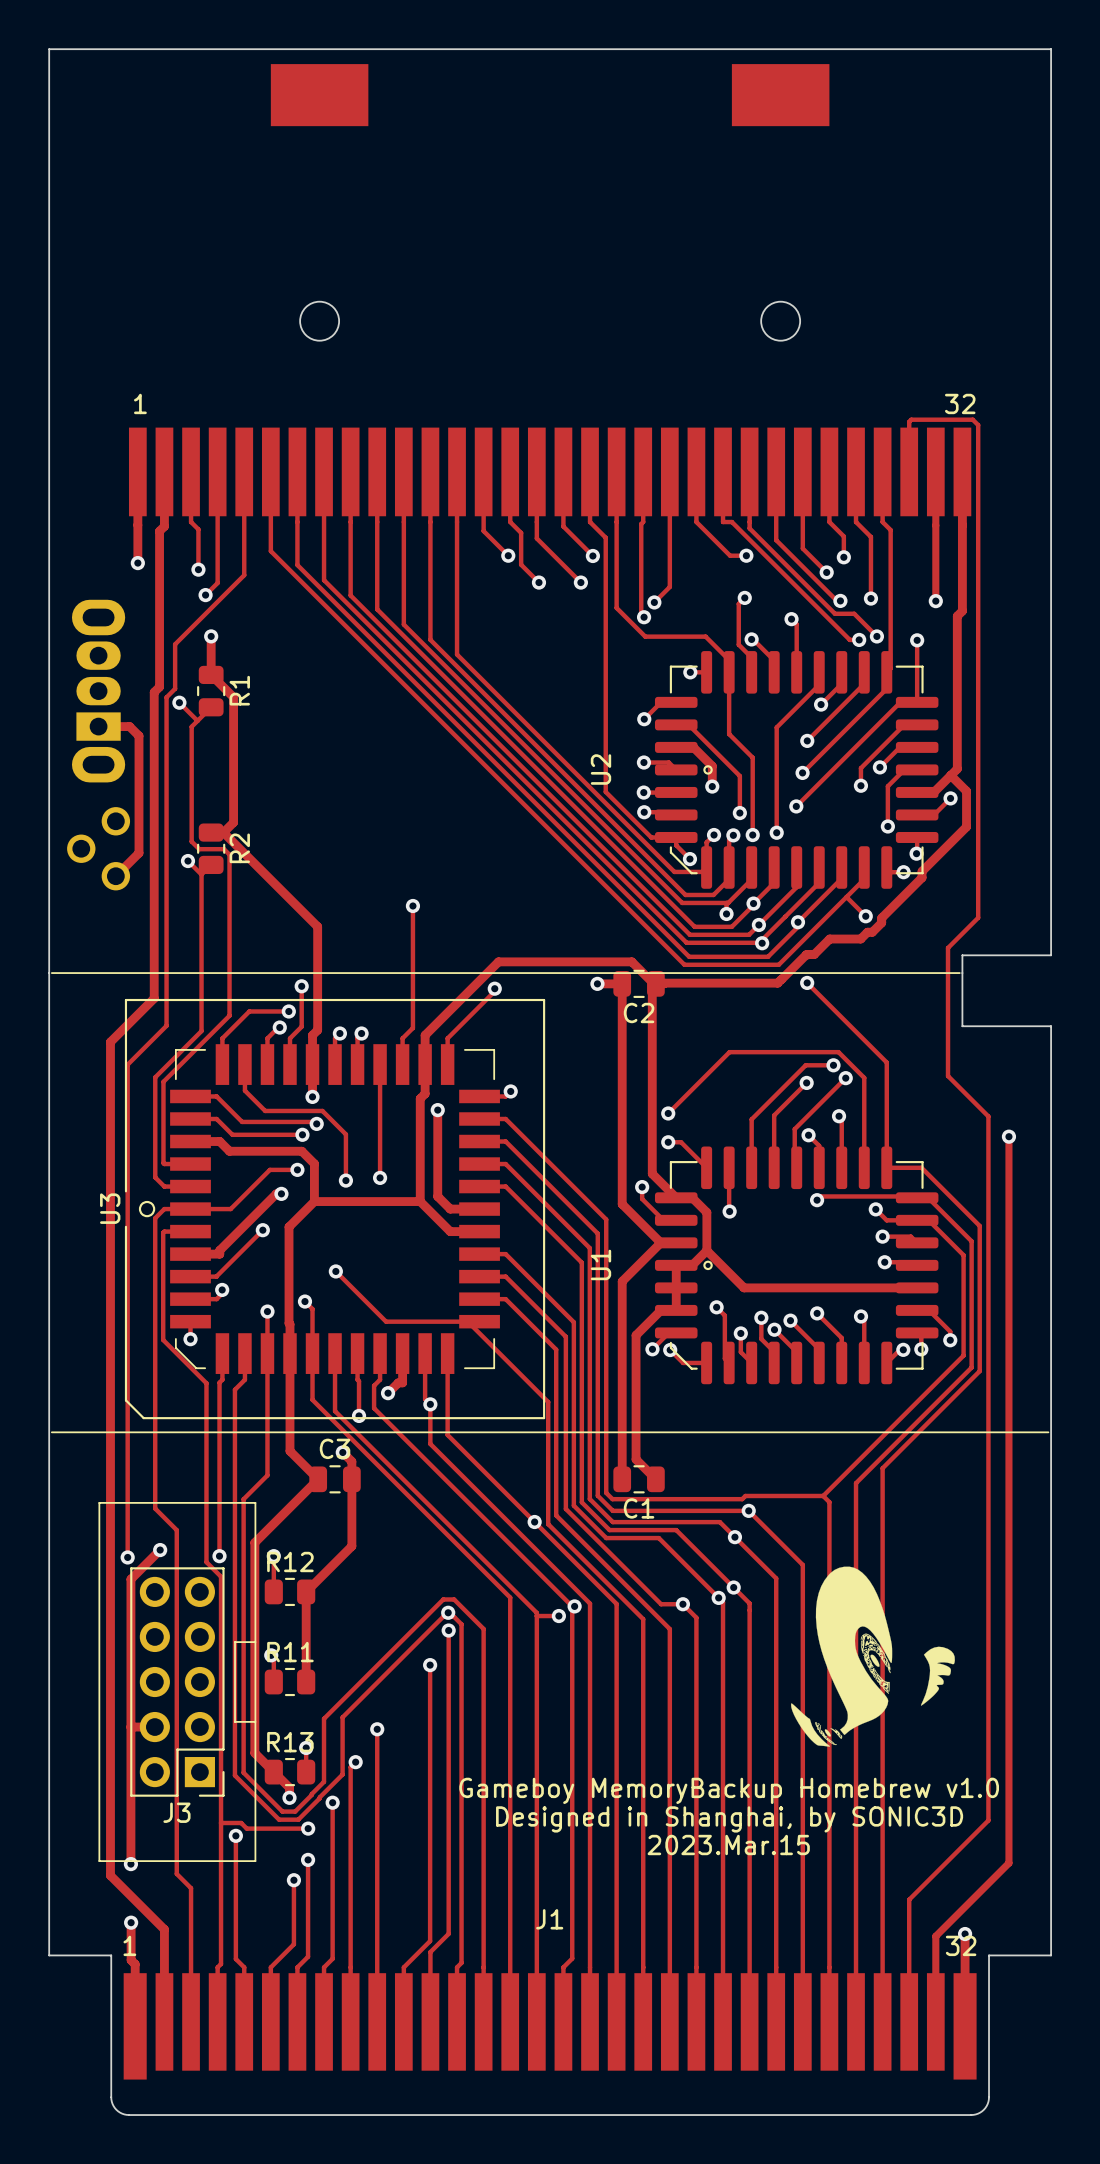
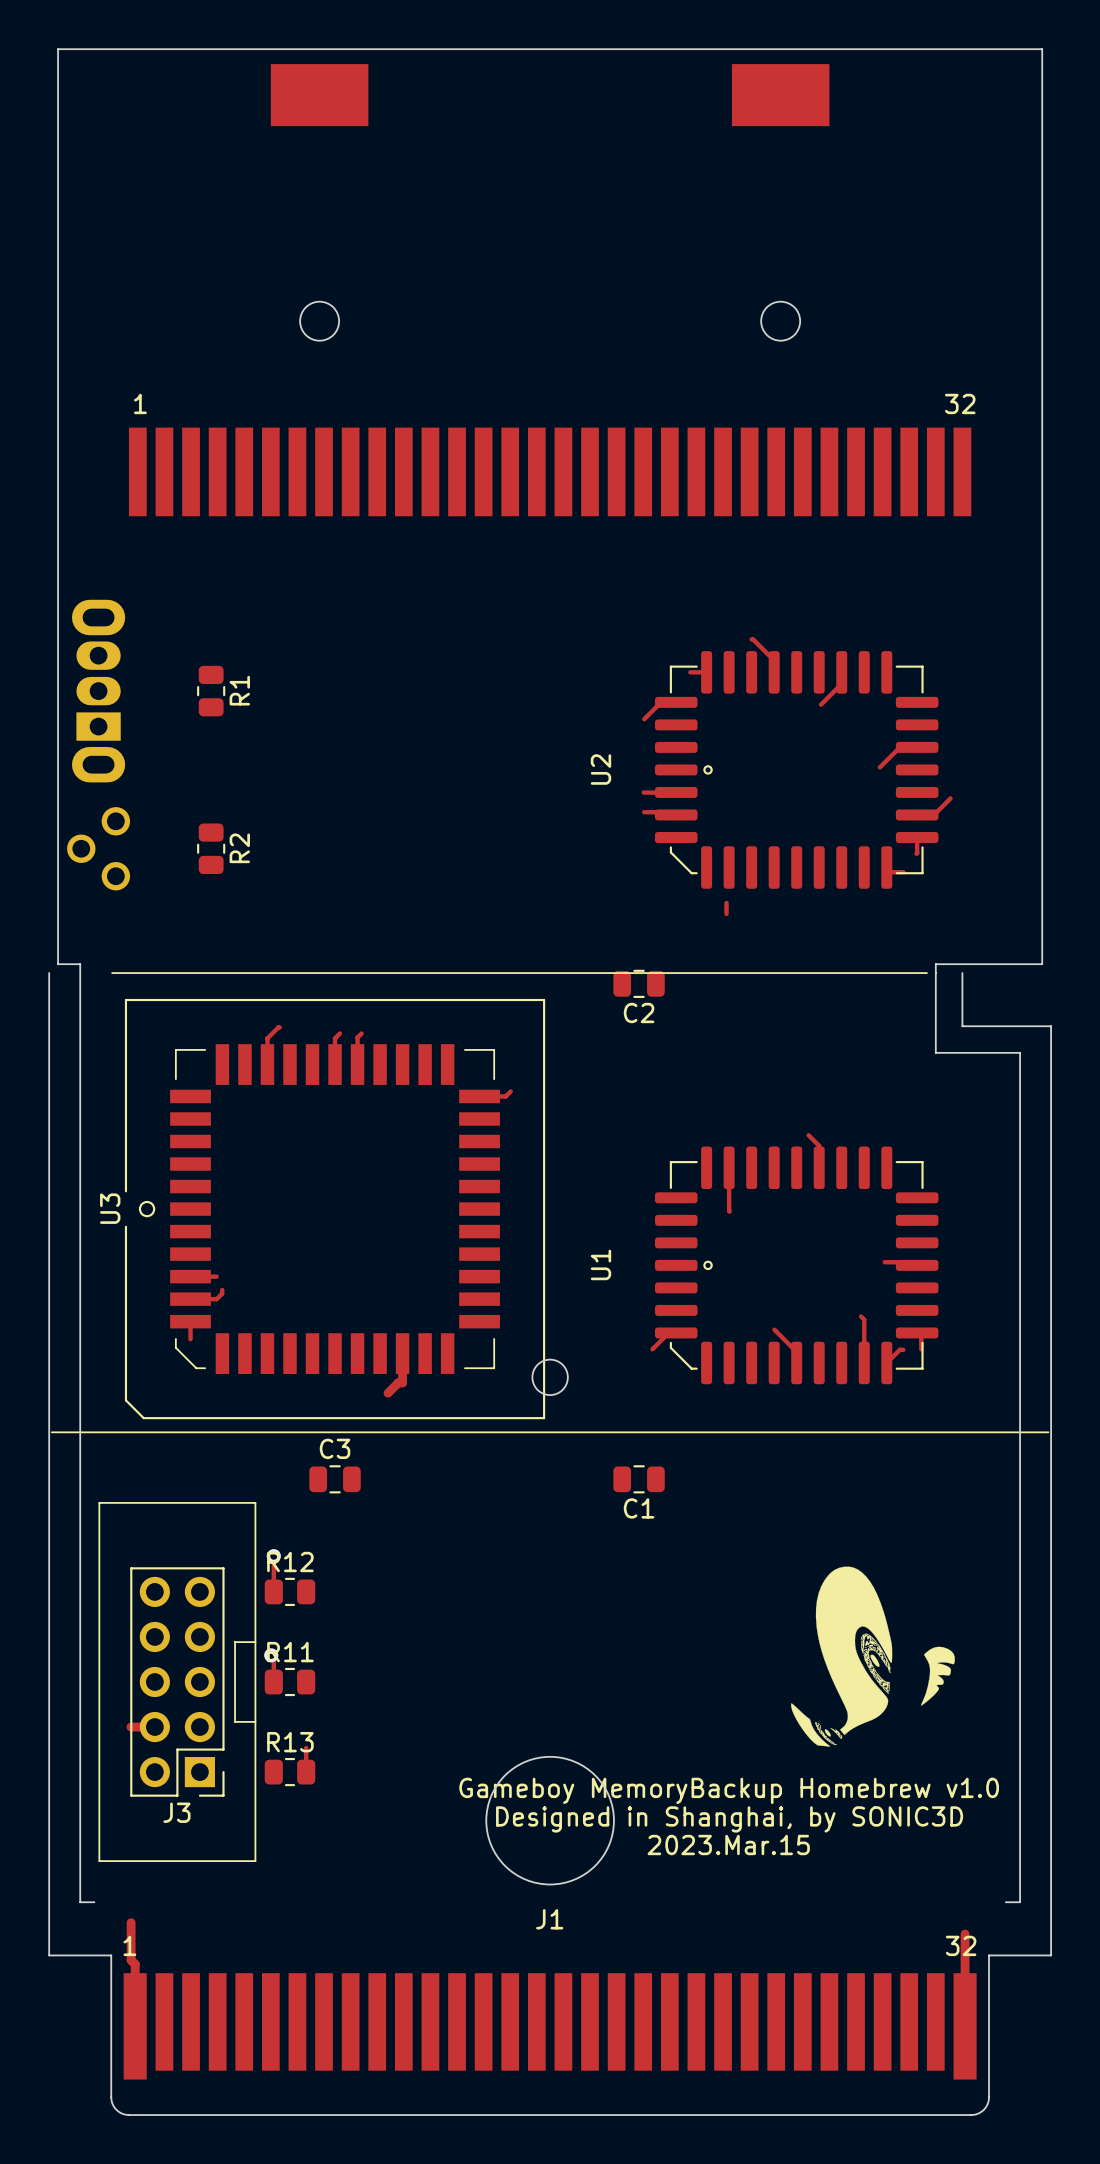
board edge: (58, 49) (49, 49) (49, 973) -> (58, 49) (58, 964) (80, 964) (80, 1902) (94, 1902)
board edge: (1042, 49) (1051, 49) (1051, 955) (962, 955) (962, 973) -> (1042, 49) (1042, 964) (935, 964) (935, 1052) (1020, 1052) (1020, 1902) (1005, 1902)
track: (137, 471) (137, 563) -> none
track: (164, 471) (164, 526) (159, 531) (159, 686) (154, 692) (154, 998) (110, 1042) (110, 1875) (164, 1929) (164, 2021) -> none
track: (191, 471) (191, 522) (198, 529) (198, 569) -> none
track: (217, 471) (217, 583) (205, 595) -> none
track: (244, 471) (244, 575) (175, 644) (175, 688) (166, 697) (166, 1025) (127, 1064) (127, 1557) -> none
track: (270, 471) (270, 551) (684, 964) (778, 964) (864, 879) (864, 867) -> none
track: (297, 471) (297, 565) (689, 956) (768, 956) (797, 926) (797, 922) (841, 878) (841, 867) -> none
track: (324, 471) (324, 580) (686, 942) (759, 942) (785, 916) -> none
track: (350, 471) (350, 595) (689, 934) (749, 934) (796, 887) (796, 867) -> none
track: (377, 471) (377, 609) (694, 926) (731, 926) (774, 882) (774, 867) -> none
track: (403, 471) (403, 624) (682, 902) (728, 902) (751, 879) (751, 867) -> none
track: (430, 471) (430, 639) (685, 894) (713, 894) (729, 879) (729, 839) (733, 835) -> none
track: (457, 471) (457, 654) (674, 871) (702, 871) (706, 867) (706, 842) (714, 835) -> none
track: (483, 471) (483, 531) (508, 555) -> none
track: (510, 471) (510, 522) (521, 532) (521, 564) (538, 582) -> none
track: (536, 471) (536, 538) (580, 582) -> none
track: (563, 471) (563, 526) (592, 556) -> none
track: (590, 471) (590, 522) (605, 537) (605, 791) (651, 837) (676, 837) (676, 845) (689, 859) -> none
track: (616, 471) (616, 607) (645, 636) (705, 636) (729, 660) (729, 734) (752, 757) (752, 835) -> none
track: (643, 471) (641, 614) (644, 617) -> none
track: (669, 471) (669, 586) (654, 602) -> none
track: (696, 471) (696, 522) (730, 555) (746, 555) -> none
track: (723, 471) (723, 522) (731, 522) (849, 639) (859, 639) -> none
track: (749, 471) (749, 528) (834, 613) (854, 613) (876, 636) -> none
track: (776, 471) (776, 540) (836, 600) (840, 600) -> none
track: (802, 471) (802, 548) (826, 572) -> none
track: (829, 471) (829, 522) (843, 536) (843, 557) -> none
track: (856, 471) (856, 522) (870, 536) (870, 598) -> none
track: (882, 471) (882, 522) (890, 530) (890, 668) (886, 672) (886, 688) (802, 772) -> none
track: (909, 471) (909, 421) (911, 419) (972, 419) (978, 425) (978, 917) (948, 948) (948, 1076) (988, 1116) (988, 1820) (909, 1899) (909, 2021) -> none
track: (935, 471) (935, 601) -> none
track: (962, 471) (962, 611) (957, 616) (957, 768) (933, 792) (917, 792) -> none
via: (508, 555) -> none
via: (746, 555) -> none
via: (592, 556) -> none
via: (843, 557) -> none
via: (137, 563) -> none
via: (198, 569) -> none
via: (826, 572) -> none
via: (538, 582) -> none
via: (580, 582) -> none
via: (205, 595) -> none
track: (744, 597) (738, 603) (738, 644) (751, 657) (751, 672) -> none
via: (744, 597) -> none
via: (870, 598) -> none
via: (840, 600) -> none
via: (935, 601) -> none
via: (654, 602) -> none
via: (644, 617) -> none
track: (791, 619) (796, 624) (796, 672) -> none
via: (791, 619) -> none
track: (211, 636) (211, 674) (233, 697) (233, 822) (223, 832) -> none
via: (211, 636) -> none
via: (876, 636) -> none
via: (751, 639) -> none
via: (859, 639) -> none
track: (917, 640) (917, 702) (900, 702) (796, 806) -> none
via: (917, 640) -> none
via: (690, 672) -> none
track: (819, 672) (819, 684) (776, 727) (776, 832) -> none
track: (864, 672) (864, 683) (807, 740) -> none
track: (179, 702) (197, 720) -> none
via: (179, 702) -> none
via: (821, 704) -> none
track: (211, 707) (191, 726) (191, 841) (199, 849) (224, 849) (229, 854) (229, 1015) (163, 1081) (163, 1163) (190, 1164) -> none
via: (644, 719) -> none
track: (676, 724) (688, 724) (739, 776) (739, 813) -> none
track: (917, 724) (904, 724) (860, 768) (860, 785) -> none
track: (98, 726) (129, 726) (138, 735) (138, 853) (115, 876) -> none
via: (807, 740) -> none
track: (676, 747) (693, 747) (712, 766) (712, 786) -> none
track: (643, 762) (668, 762) (676, 769) -> none
via: (643, 762) -> none
via: (879, 767) -> none
track: (917, 769) (904, 769) (887, 786) (887, 826) -> none
via: (802, 772) -> none
track: (950, 775) (966, 791) (966, 826) (922, 871) (922, 877) (881, 918) (881, 922) (872, 932) (867, 932) (860, 939) (829, 939) (814, 954) (809, 954) -> none
via: (860, 785) -> none
via: (712, 786) -> none
via: (643, 792) -> none
via: (950, 798) -> none
via: (796, 806) -> none
via: (644, 812) -> none
via: (739, 813) -> none
via: (887, 826) -> none
track: (223, 832) (317, 926) (317, 1030) (312, 1035) (312, 1096) -> none
via: (776, 832) -> none
via: (714, 835) -> none
via: (733, 835) -> none
via: (752, 835) -> none
via: (916, 853) -> none
via: (689, 859) -> none
track: (187, 861) (201, 874) -> none
via: (187, 861) -> none
track: (819, 867) (819, 882) (785, 916) -> none
via: (903, 872) -> none
track: (201, 874) (201, 1031) (155, 1077) (155, 1177) (164, 1186) (190, 1186) -> none
track: (846, 897) (865, 916) -> none
via: (753, 903) -> none
track: (412, 906) (412, 1028) (402, 1038) (402, 1064) -> none
via: (412, 906) -> none
via: (726, 913) -> none
via: (865, 916) -> none
via: (797, 922) -> none
via: (758, 924) -> none
via: (762, 943) -> none
track: (808, 954) (806, 954) (781, 979) -> none
line: (51, 973) (112, 973) -> none
line: (926, 973) (959, 973) -> none
track: (781, 979) (777, 983) (664, 983) (655, 983) (652, 987) (652, 1173) (676, 1197) (692, 1197) (706, 1212) (706, 1250) -> none
track: (807, 982) (886, 1062) (886, 1167) (921, 1167) (979, 1225) (979, 1371) (882, 1468) (882, 2021) -> none
via: (807, 982) -> none
track: (597, 983) (622, 983) (622, 1204) (660, 1242) -> none
via: (597, 983) -> none
track: (654, 984) (631, 961) (498, 961) (425, 1035) (425, 1093) (420, 1098) (420, 1201) -> none
track: (301, 986) (301, 1026) (289, 1038) (289, 1064) -> none
via: (301, 986) -> none
track: (494, 988) (494, 991) (447, 1038) (447, 1064) -> none
via: (494, 988) -> none
track: (288, 1011) (249, 1011) (222, 1038) (222, 1064) -> none
via: (288, 1011) -> none
via: (279, 1027) -> none
via: (339, 1033) -> none
via: (361, 1033) -> none
track: (244, 1064) (244, 1090) (265, 1110) (322, 1110) (345, 1134) (345, 1180) -> none
track: (380, 1064) (380, 1177) -> none
track: (833, 1065) (805, 1065) (751, 1119) (751, 1167) -> none
via: (833, 1065) -> none
track: (845, 1078) (794, 1129) (794, 1165) (796, 1167) -> none
via: (845, 1078) -> none
track: (806, 1082) (774, 1115) (774, 1167) -> none
via: (806, 1082) -> none
via: (510, 1091) -> none
track: (190, 1096) (216, 1096) (242, 1121) (314, 1121) (316, 1123) -> none
via: (312, 1096) -> none
track: (437, 1110) (437, 1196) (450, 1209) (479, 1209) -> none
via: (437, 1110) -> none
track: (668, 1113) (729, 1052) (838, 1052) (864, 1077) (864, 1167) -> none
via: (668, 1113) -> none
track: (839, 1116) (841, 1118) (841, 1167) -> none
via: (839, 1116) -> none
track: (190, 1118) (216, 1118) (232, 1134) (302, 1134) -> none
track: (479, 1118) (505, 1118) (606, 1219) (606, 1492) (612, 1499) (742, 1499) (745, 1495) (823, 1495) -> none
via: (316, 1123) -> none
via: (302, 1134) -> none
via: (808, 1135) -> none
track: (1008, 1136) (1008, 1863) (935, 1936) (935, 2021) -> none
via: (1008, 1136) -> none
track: (190, 1141) (219, 1141) (229, 1151) (301, 1151) (314, 1163) (314, 1201) -> none
track: (479, 1141) (505, 1141) (597, 1233) (597, 1495) (612, 1510) (748, 1510) (802, 1564) (802, 2021) -> none
track: (668, 1142) (681, 1142) (706, 1167) -> none
via: (668, 1142) -> none
track: (479, 1164) (505, 1164) (589, 1248) (589, 1499) (612, 1522) (719, 1522) (776, 1578) (776, 2021) -> none
track: (297, 1169) (269, 1169) (230, 1209) (164, 1209) (155, 1218) (155, 1508) (176, 1530) (176, 1873) (191, 1888) (191, 2021) -> none
via: (297, 1169) -> none
via: (380, 1177) -> none
via: (345, 1180) -> none
track: (479, 1186) (505, 1186) (581, 1262) (581, 1502) (609, 1530) (676, 1530) (749, 1603) (749, 2021) -> none
track: (642, 1187) (642, 1199) (663, 1220) (676, 1220) -> none
via: (642, 1187) -> none
track: (281, 1193) (276, 1193) (219, 1250) (219, 1254) (190, 1254) -> none
via: (281, 1193) -> none
track: (817, 1200) (820, 1196) (928, 1197) (971, 1241) (971, 1367) (856, 1483) (856, 2021) -> none
via: (817, 1200) -> none
track: (314, 1201) (289, 1226) (289, 1451) (318, 1479) (254, 1542) (254, 1753) (289, 1787) (289, 1797) -> none
track: (314, 1201) (420, 1201) -> none
track: (420, 1201) (450, 1231) (479, 1231) -> none
track: (875, 1209) (886, 1220) (928, 1220) (963, 1255) (963, 1355) (823, 1495) -> none
via: (875, 1209) -> none
via: (729, 1211) -> none
track: (262, 1230) (216, 1276) -> none
via: (262, 1230) -> none
track: (190, 1231) (163, 1232) (163, 1339) (206, 1383) (206, 1562) (221, 1576) (221, 1964) (217, 1967) (217, 2021) -> none
track: (882, 1236) (910, 1236) (917, 1242) -> none
via: (882, 1236) -> none
track: (660, 1242) (622, 1281) (622, 1479) -> none
track: (706, 1250) (692, 1265) (676, 1265) (676, 1310) (660, 1310) (636, 1335) (636, 1459) (655, 1479) -> none
track: (706, 1250) (744, 1287) (917, 1287) -> none
track: (479, 1254) (505, 1254) (573, 1322) (573, 1505) (606, 1538) (658, 1538) (723, 1602) (723, 2021) -> none
via: (884, 1262) -> none
track: (335, 1271) (386, 1321) (479, 1321) -> none
via: (335, 1271) -> none
track: (479, 1276) (505, 1276) (565, 1336) (565, 1508) (661, 1604) (682, 1604) (696, 1617) (696, 2021) -> none
via: (222, 1289) -> none
track: (479, 1299) (505, 1299) (556, 1349) (556, 1515) (669, 1629) (669, 2021) -> none
track: (304, 1301) (312, 1309) (312, 1399) (510, 1597) (510, 2021) -> none
via: (304, 1301) -> none
track: (716, 1307) (724, 1315) (724, 1358) (729, 1362) -> none
via: (716, 1307) -> none
track: (917, 1310) (929, 1310) (950, 1331) (950, 1340) -> none
track: (267, 1311) (267, 1475) (243, 1499) (243, 1772) (282, 1811) (295, 1811) (324, 1781) (324, 1718) (443, 1599) (454, 1599) (483, 1628) (483, 2021) -> none
via: (267, 1311) -> none
track: (817, 1313) (841, 1337) (841, 1362) -> none
via: (817, 1313) -> none
via: (861, 1316) -> none
track: (761, 1317) (761, 1339) (774, 1351) (774, 1362) -> none
via: (761, 1317) -> none
track: (790, 1320) (819, 1349) (819, 1362) -> none
via: (790, 1320) -> none
track: (467, 1321) (548, 1402) (548, 1524) (643, 1619) (643, 2021) -> none
via: (774, 1329) -> none
track: (740, 1333) (740, 1352) (751, 1362) -> none
via: (740, 1333) -> none
via: (190, 1339) -> none
via: (950, 1340) -> none
via: (652, 1349) -> none
via: (903, 1349) -> none
via: (921, 1349) -> none
track: (670, 1350) (683, 1362) (706, 1362) -> none
via: (670, 1350) -> none
track: (222, 1353) (222, 1379) (219, 1382) (219, 1556) -> none
track: (244, 1353) (244, 1379) (234, 1389) (234, 1775) (279, 1819) (298, 1819) (342, 1774) (342, 1717) (443, 1616) (454, 1616) (461, 1624) (461, 1962) (457, 1967) (457, 2021) -> none
track: (335, 1353) (335, 1411) (536, 1612) (536, 2021) -> none
track: (357, 1353) (359, 1415) -> none
track: (380, 1353) (380, 1379) (374, 1385) (374, 1408) (572, 1606) -> none
track: (425, 1353) (425, 1399) (430, 1404) (430, 1443) (590, 1603) (590, 2021) -> none
track: (447, 1353) (447, 1435) (616, 1603) (616, 2021) -> none
round board edge: none -> [531, 1358, 569, 1396]
via: (388, 1393) -> none
via: (430, 1404) -> none
via: (359, 1415) -> none
track: (342, 1452) (351, 1461) (351, 1546) (306, 1591) (306, 1682) -> none
via: (342, 1452) -> none
track: (823, 1495) (829, 1502) (829, 2021) -> none
via: (748, 1510) -> none
via: (534, 1522) -> none
via: (734, 1537) -> none
track: (160, 1550) (130, 1579) (130, 1864) -> none
via: (160, 1550) -> none
via: (219, 1556) -> none
via: (127, 1557) -> none
via: (733, 1587) -> none
via: (718, 1597) -> none
via: (682, 1604) -> none
track: (572, 1606) (572, 1958) (563, 1967) (563, 2021) -> none
via: (574, 1606) -> none
via: (448, 1612) -> none
track: (536, 1616) (558, 1616) -> none
via: (558, 1616) -> none
track: (448, 1630) (448, 1933) (430, 1952) (430, 2021) -> none
via: (448, 1630) -> none
track: (430, 1665) (430, 1941) (403, 1967) (403, 2021) -> none
via: (430, 1665) -> none
track: (377, 1729) (377, 2021) -> none
via: (377, 1729) -> none
via: (306, 1747) -> none
round board edge: none -> [485, 1755, 615, 1886]
track: (355, 1762) (350, 1767) (350, 2021) -> none
via: (355, 1762) -> none
via: (289, 1797) -> none
track: (332, 1802) (332, 1958) (324, 1967) (324, 2021) -> none
via: (332, 1802) -> none
track: (221, 1823) (241, 1823) (246, 1828) (308, 1828) -> none
via: (308, 1828) -> none
track: (235, 1835) (235, 1959) (244, 1967) (244, 2021) -> none
via: (235, 1835) -> none
track: (308, 1859) (308, 1956) (297, 1967) (297, 2021) -> none
via: (308, 1859) -> none
via: (130, 1864) -> none
track: (293, 1880) (293, 1944) (270, 1967) (270, 2021) -> none
via: (293, 1880) -> none
via: (131, 1922) -> none
via: (965, 1934) -> none

